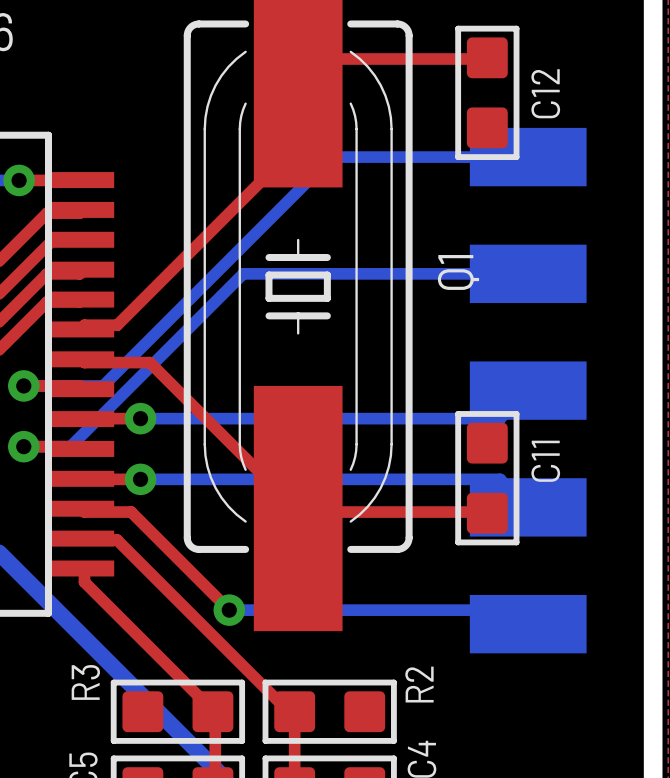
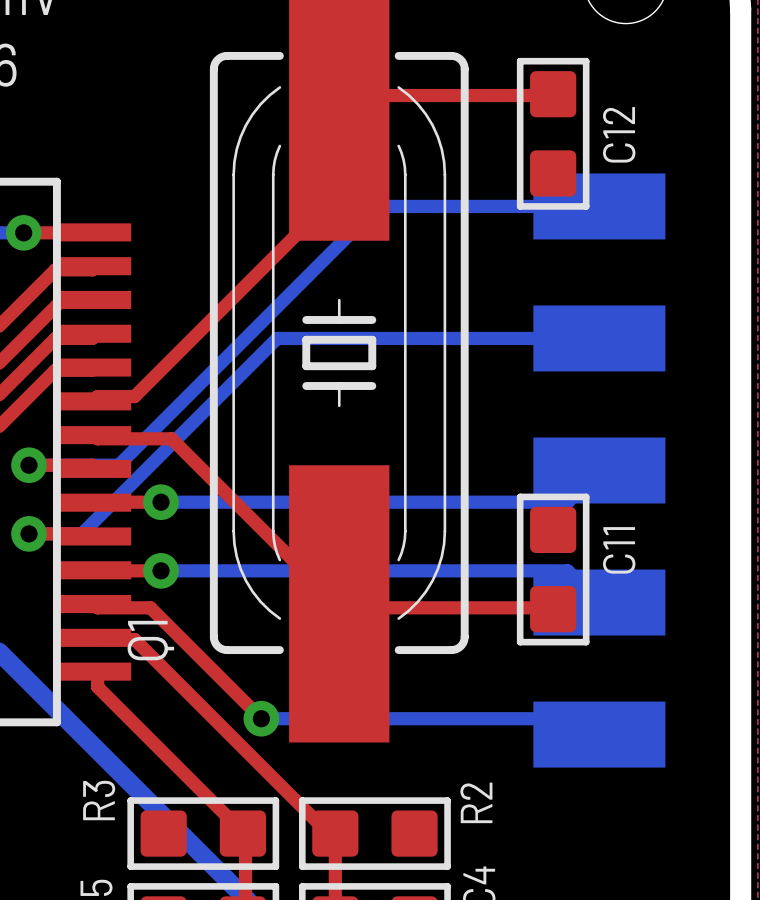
Q1 name position: Q1 (458, 272) -> Q1 (150, 640)

